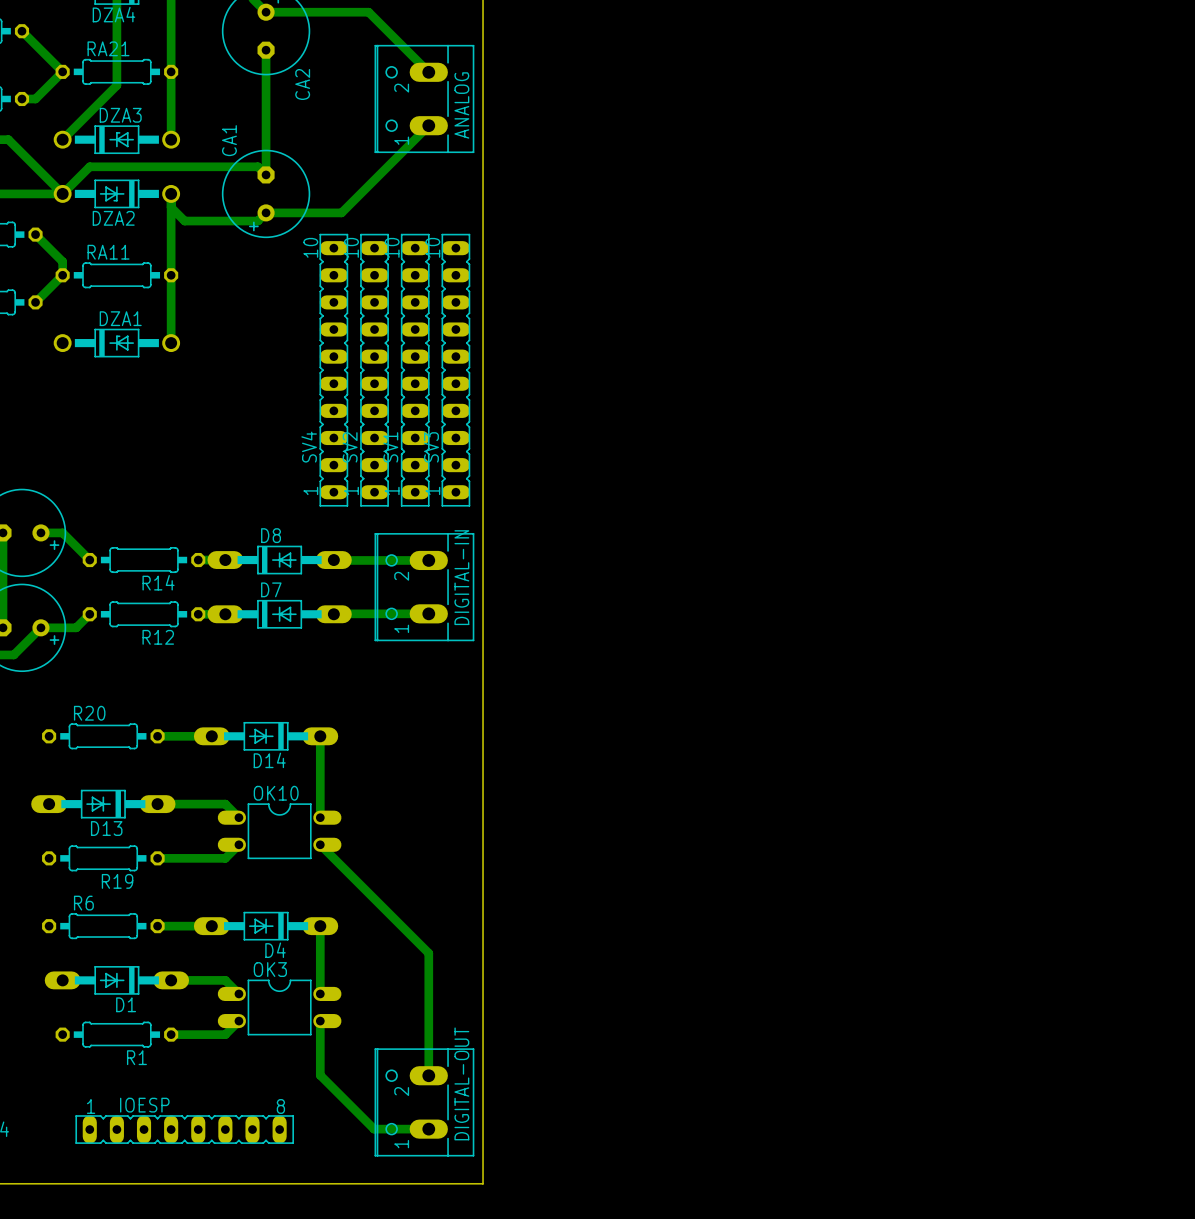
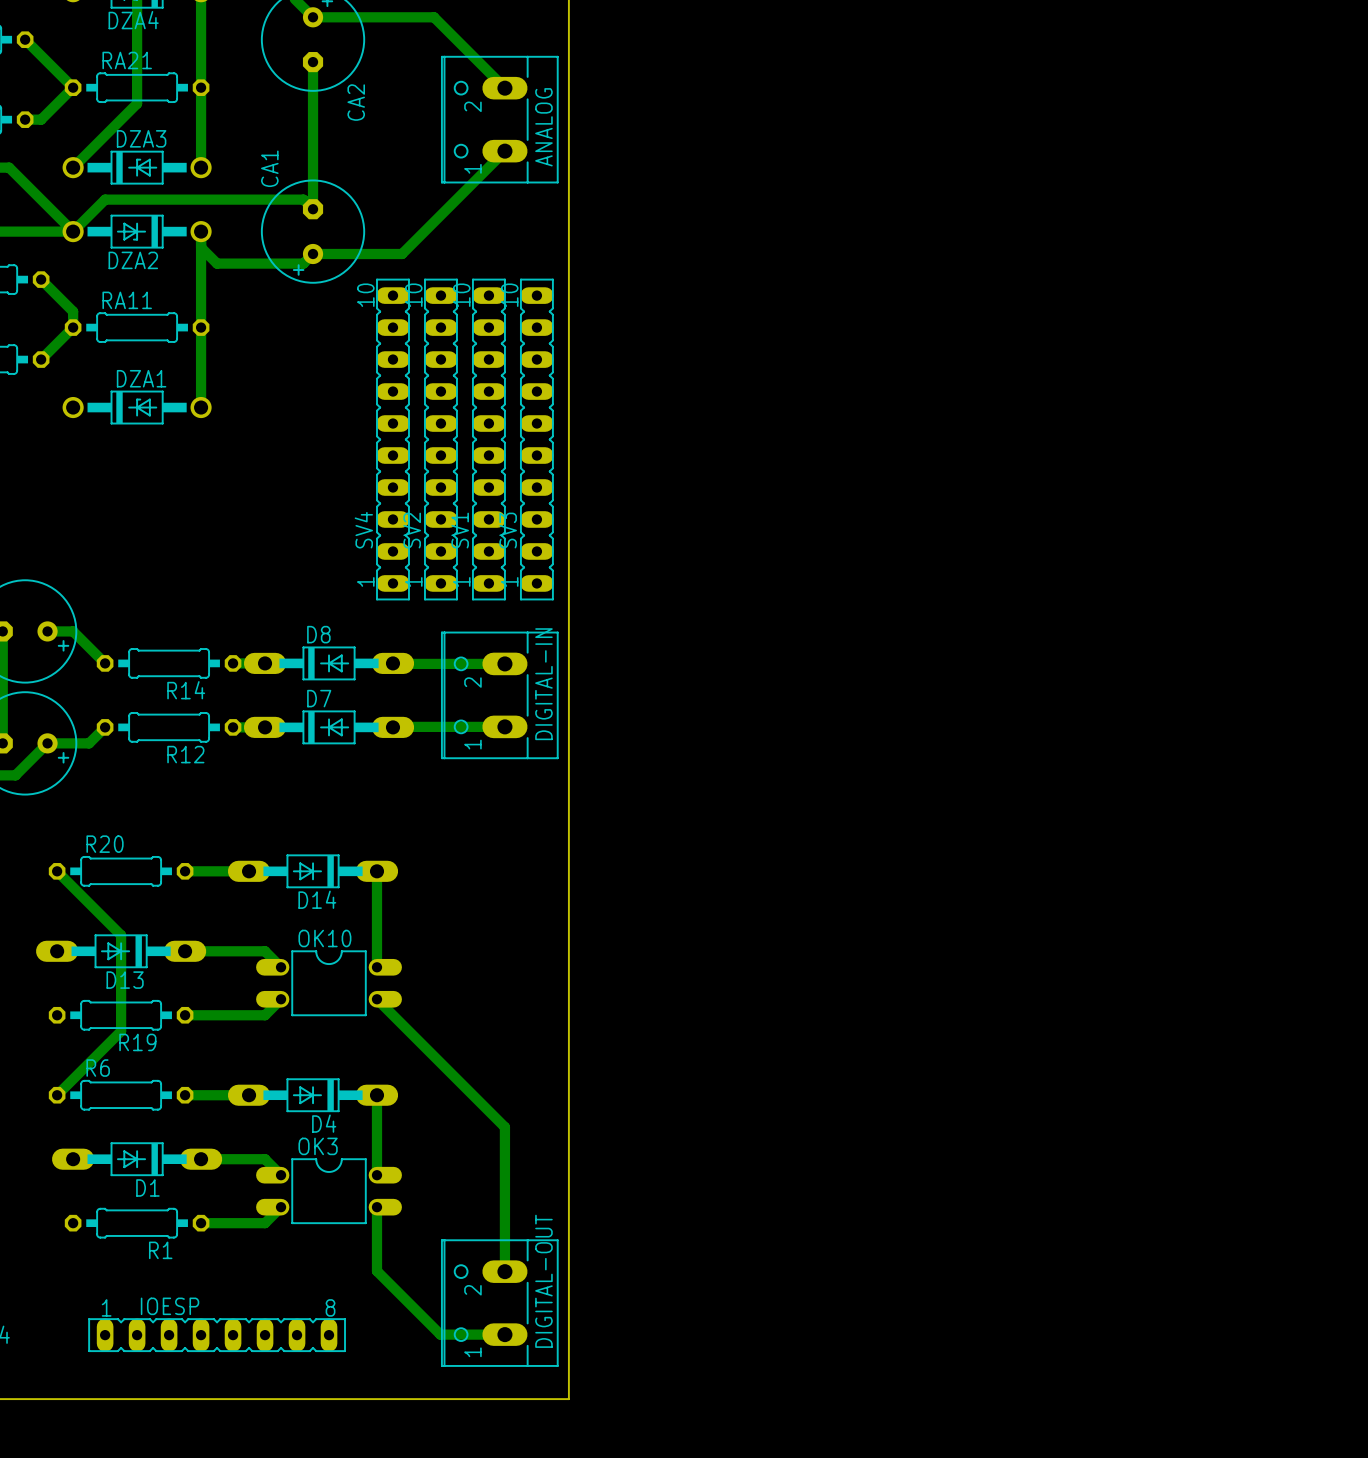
bottom track: none -> (57, 871) (121, 935) (121, 1031) (57, 1095)

